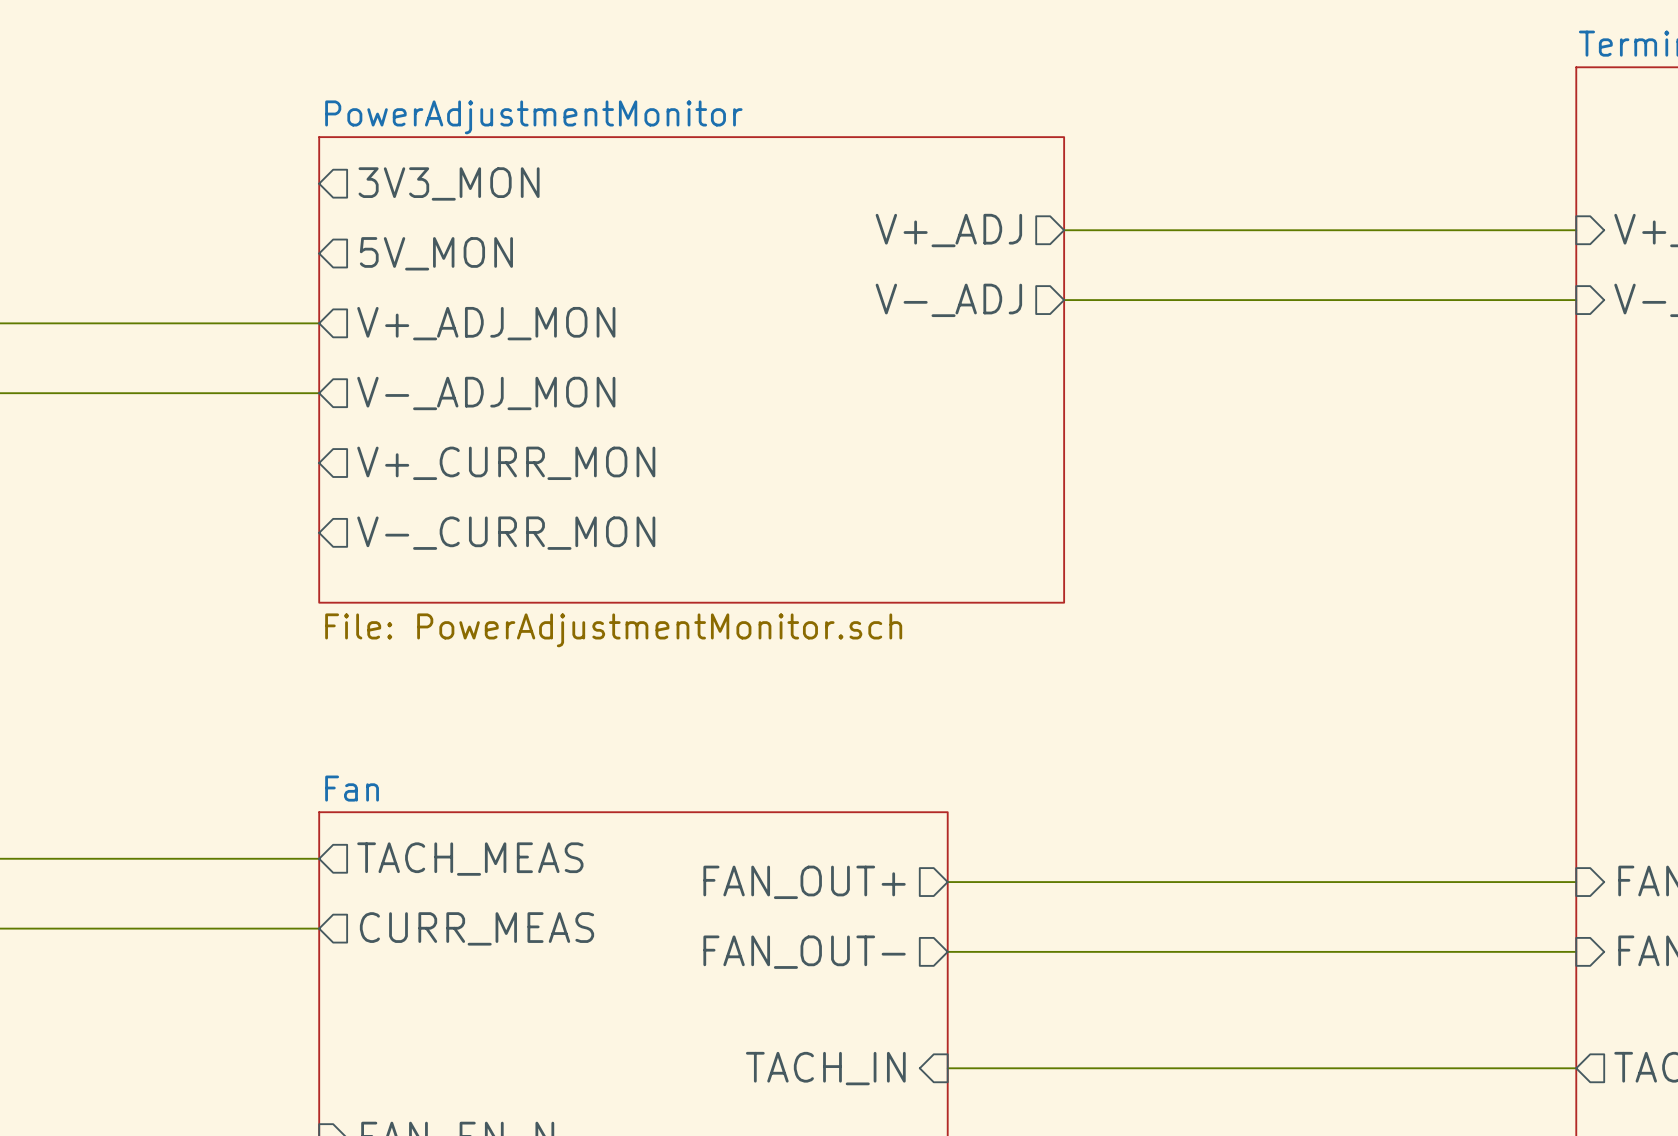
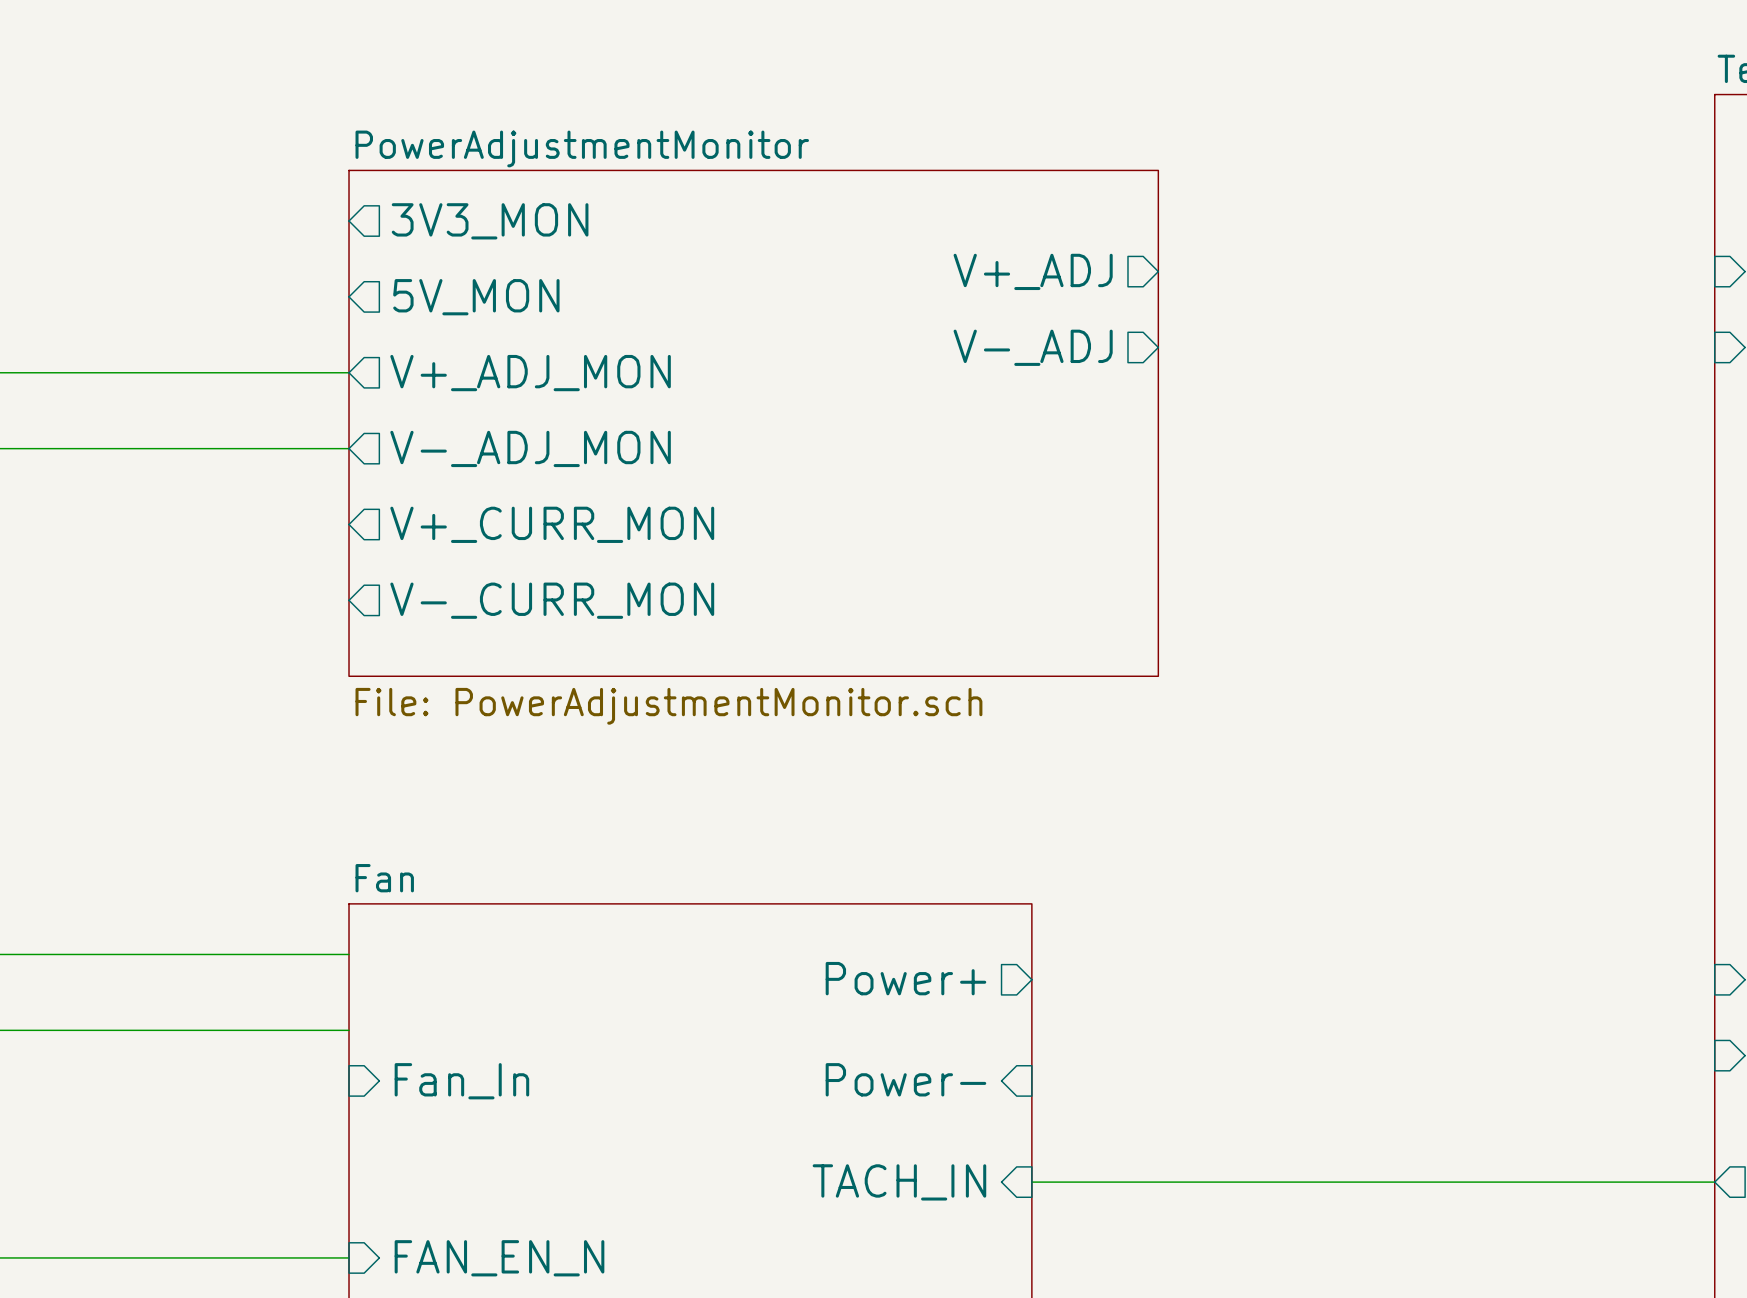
wire: (1064, 230) (1576, 230) -> none
wire: (1064, 300) (1576, 300) -> none
sheet pin: TACH_MEAS (470, 859) -> none
sheet pin: FAN_OUT+ (804, 882) -> Power+ (905, 978)
wire: (947, 882) (1576, 882) -> none
sheet pin: CURR_MEAS (476, 928) -> none
wire: (947, 951) (1576, 951) -> none
sheet pin: FAN_OUT- (804, 952) -> none
sheet pin: none -> Power- (905, 1079)
sheet pin: none -> Fan_In (461, 1081)

